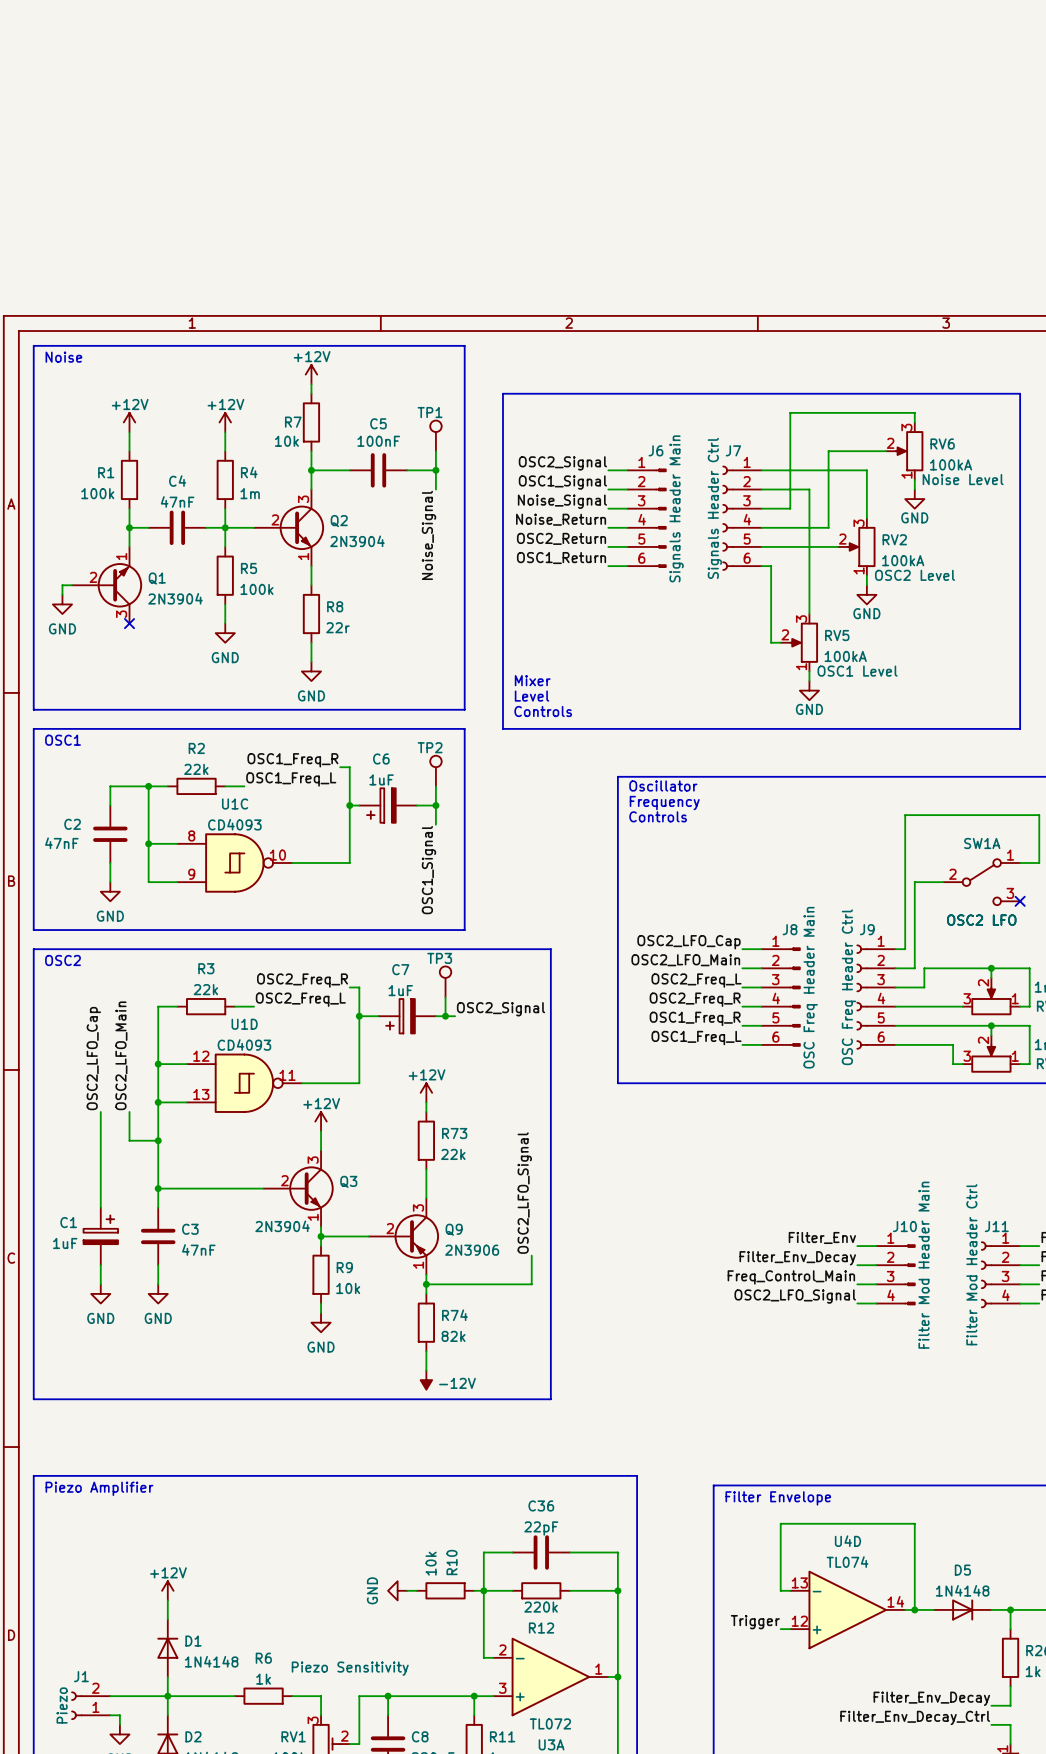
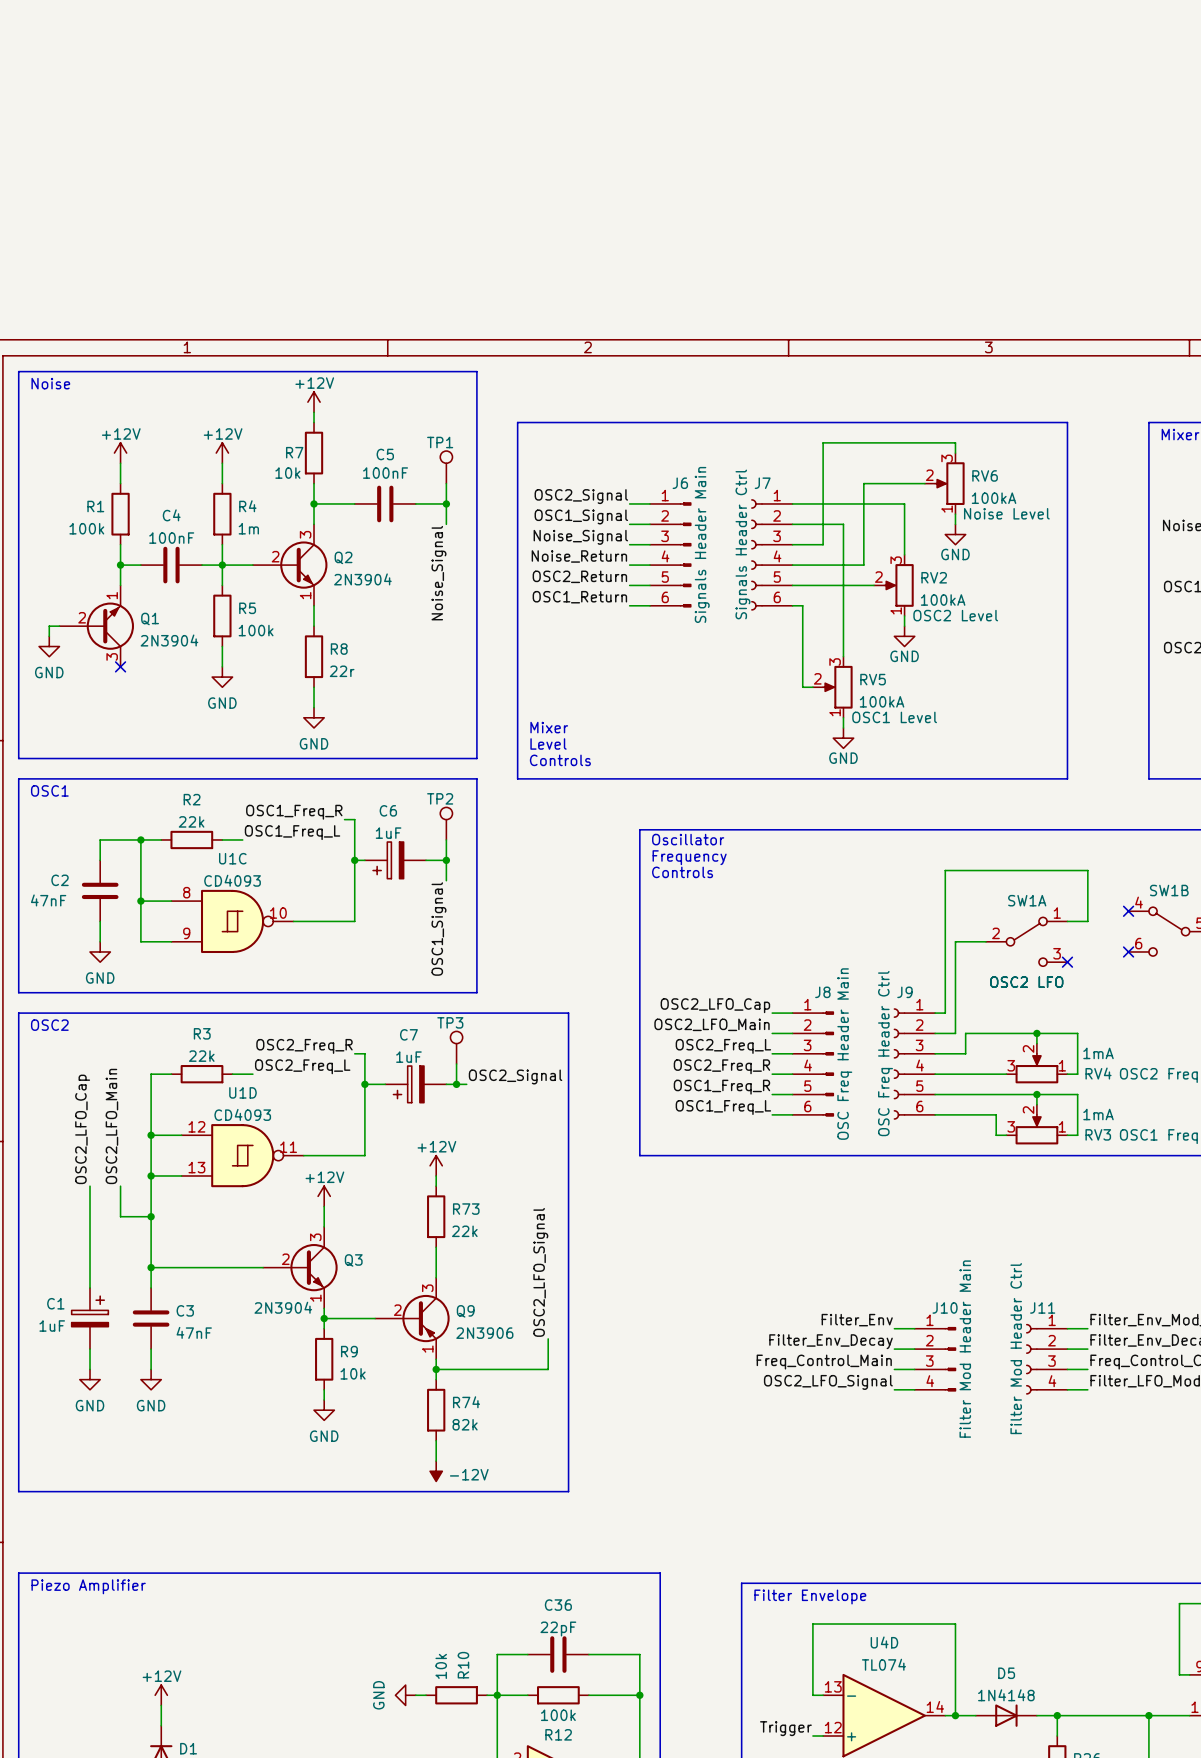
C4 value: 47nF (177, 501) -> 100nF (171, 538)
R12 value: 220k (541, 1607) -> 100k (558, 1715)

